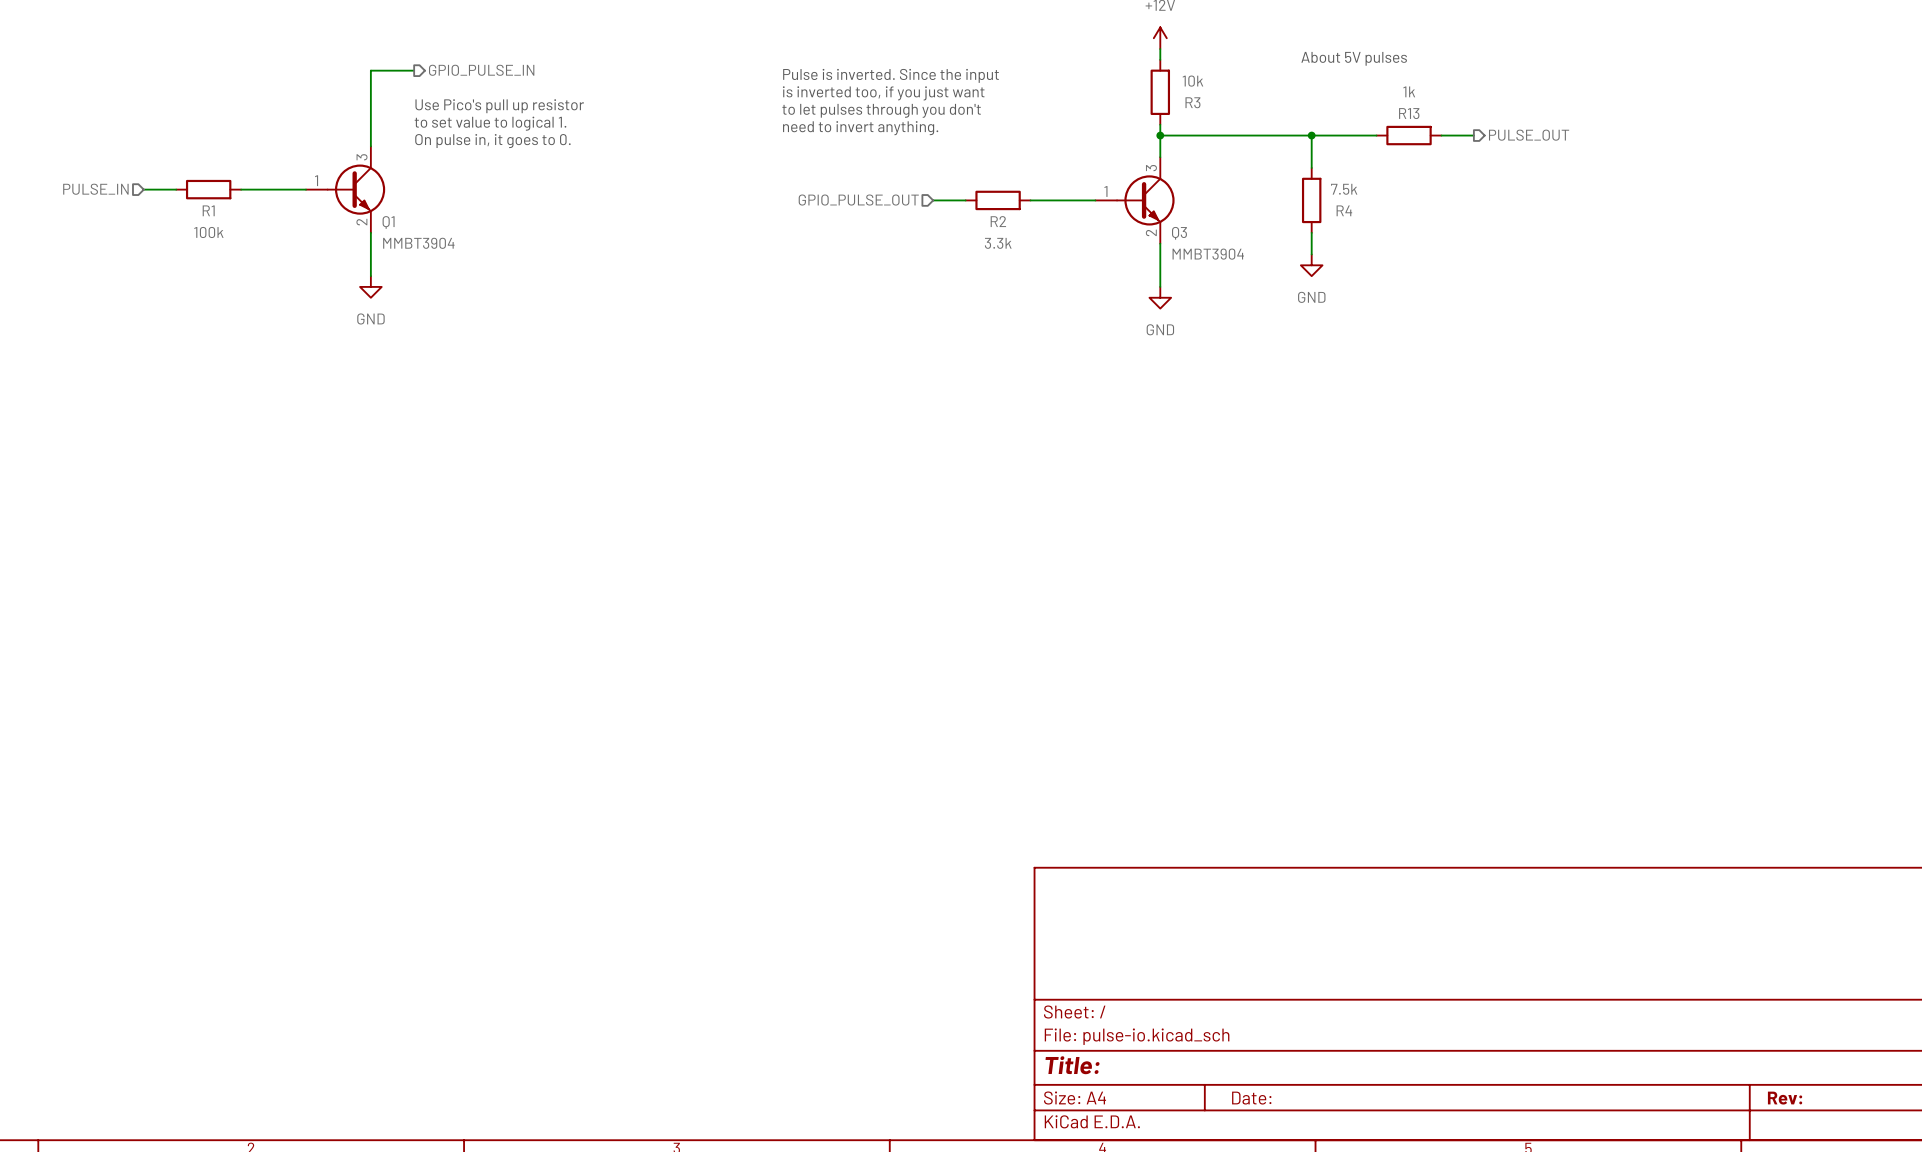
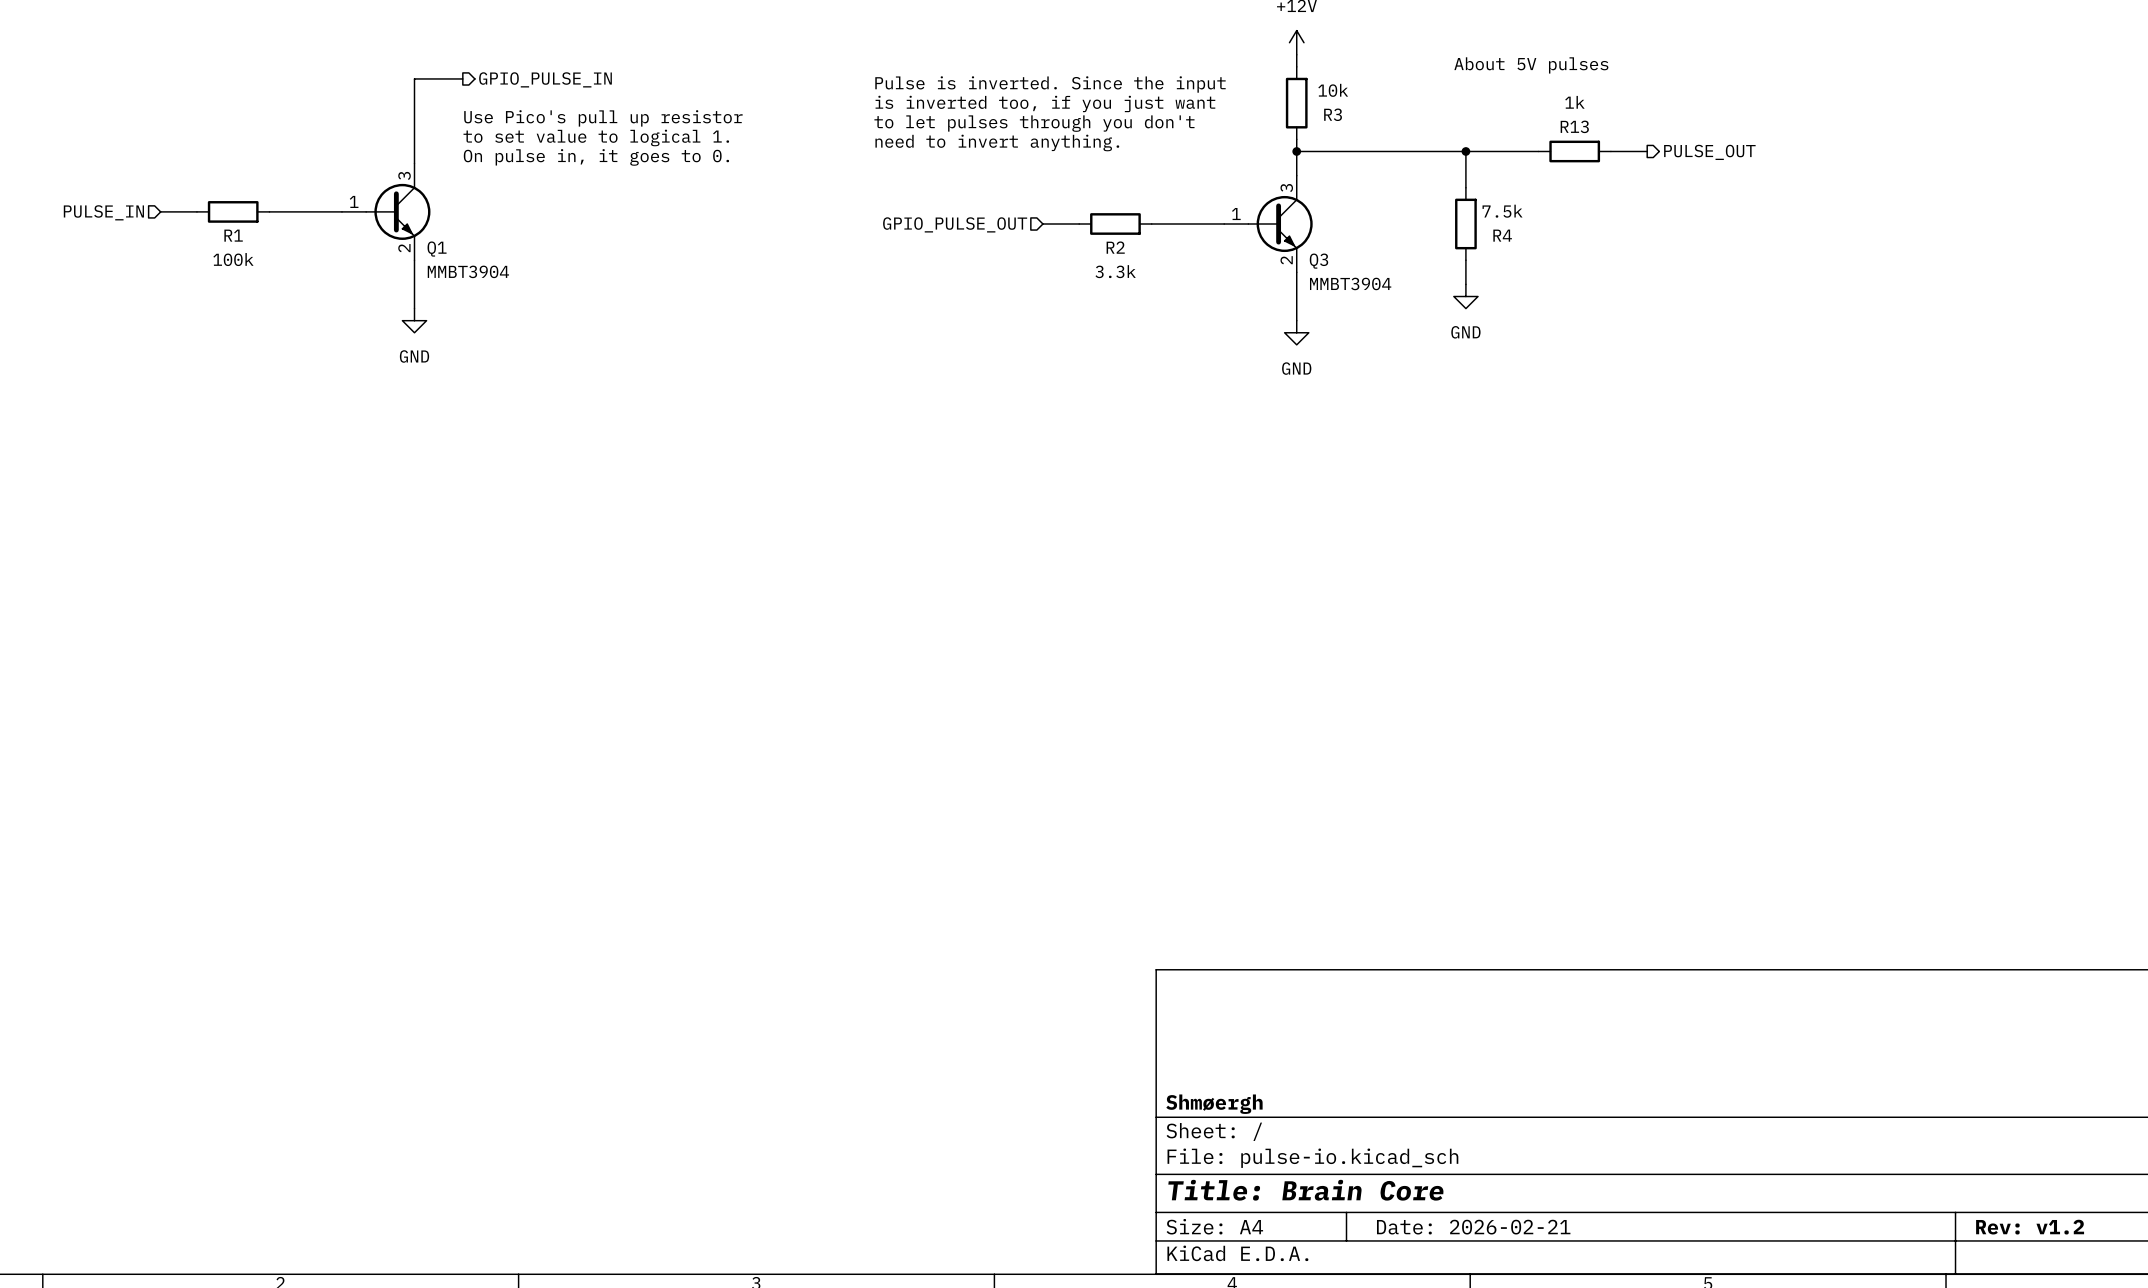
title block: none -> Shmøergh (1214, 1104)
title block: Title: (1072, 1065) -> Title: Brain Core (1305, 1190)
title block: Date: (1251, 1098) -> Date: 2026-02-21 (1473, 1227)
title block: Rev: (1785, 1098) -> Rev: v1.2 (2030, 1227)

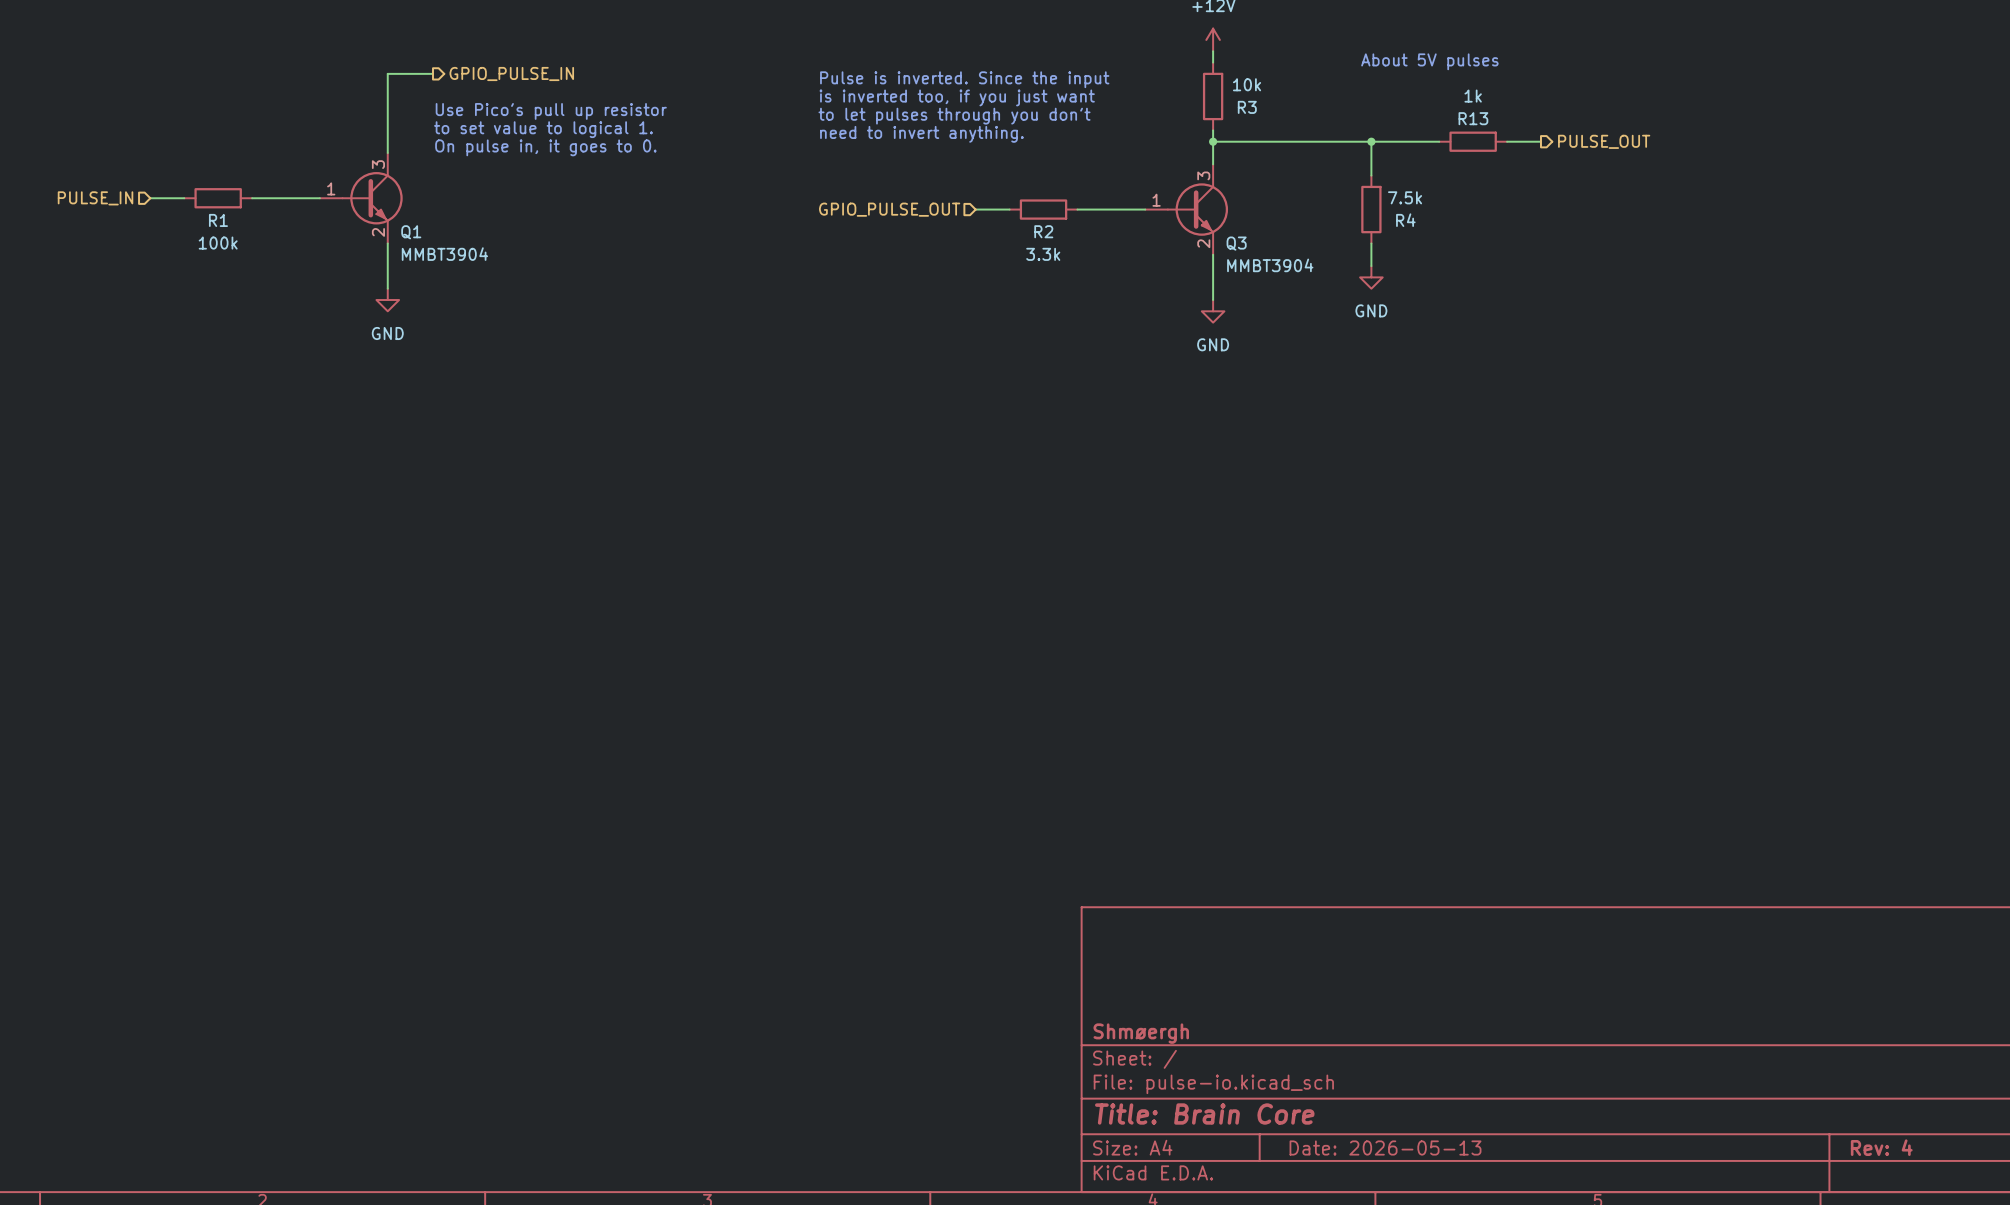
title block: Date: 2026-02-21 (1473, 1227) -> Date: 2026-05-13 (1385, 1147)
title block: Rev: v1.2 (2030, 1227) -> Rev: 4 (1881, 1147)

